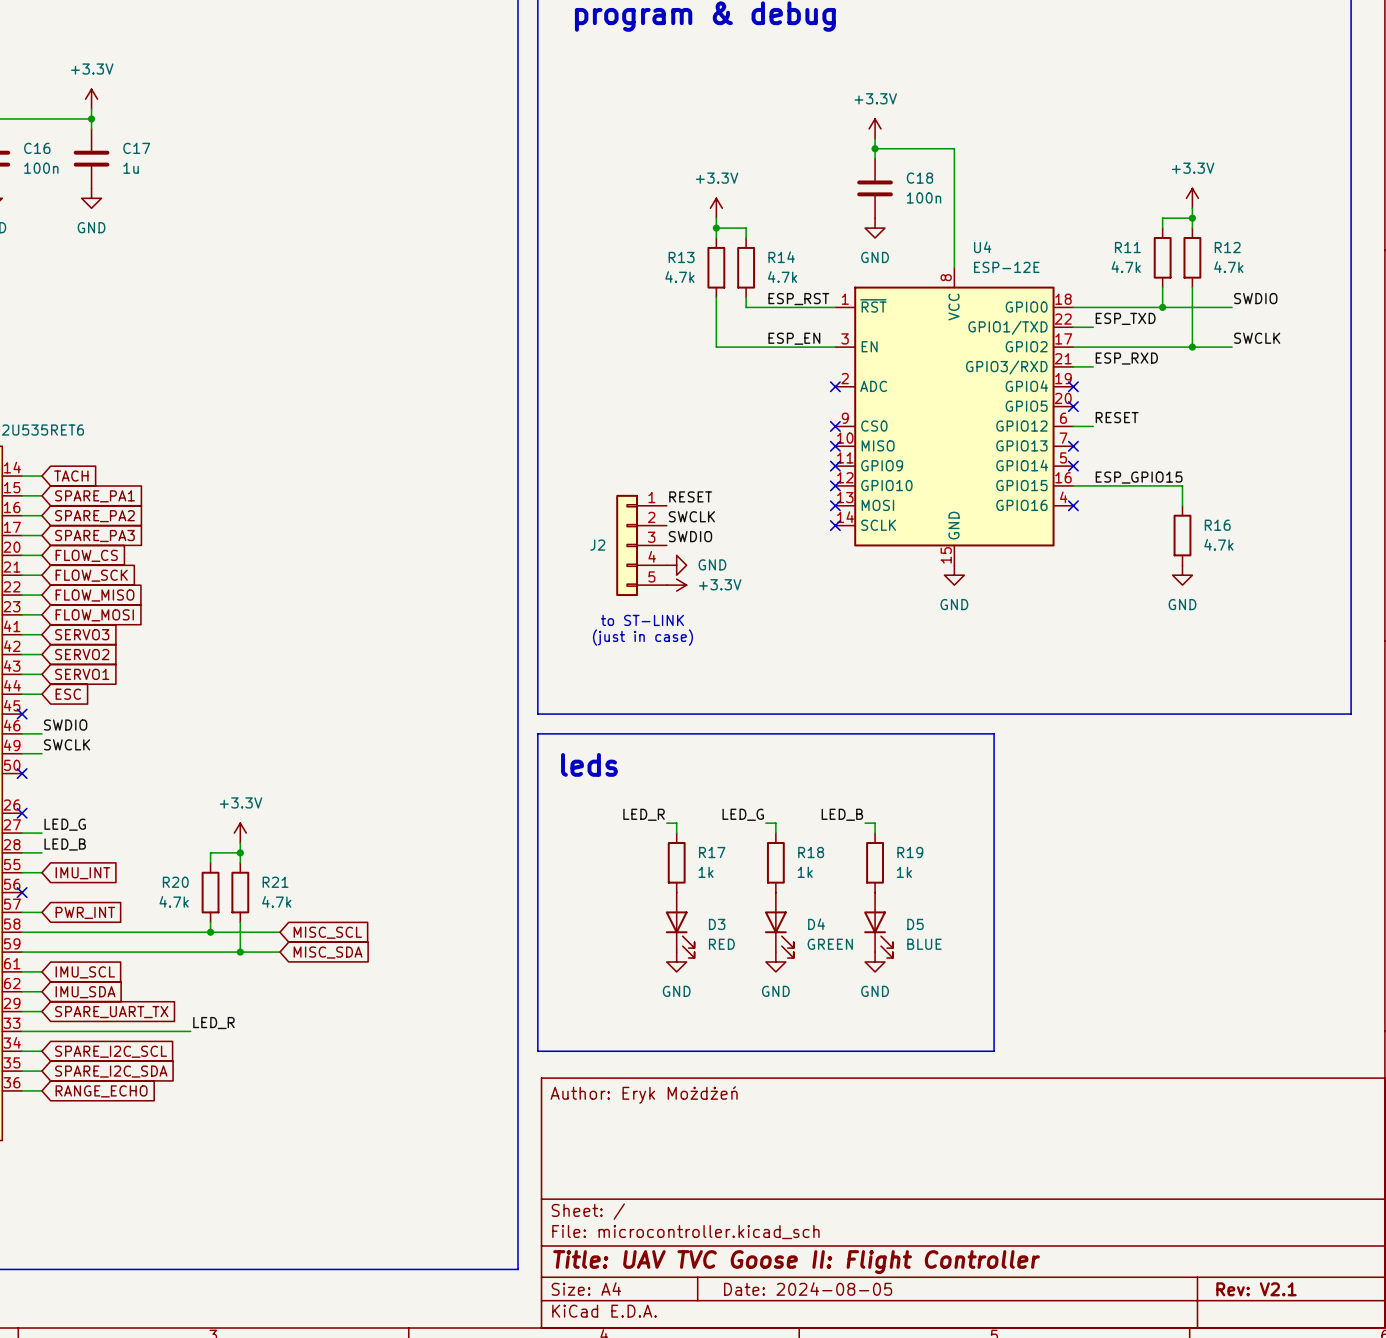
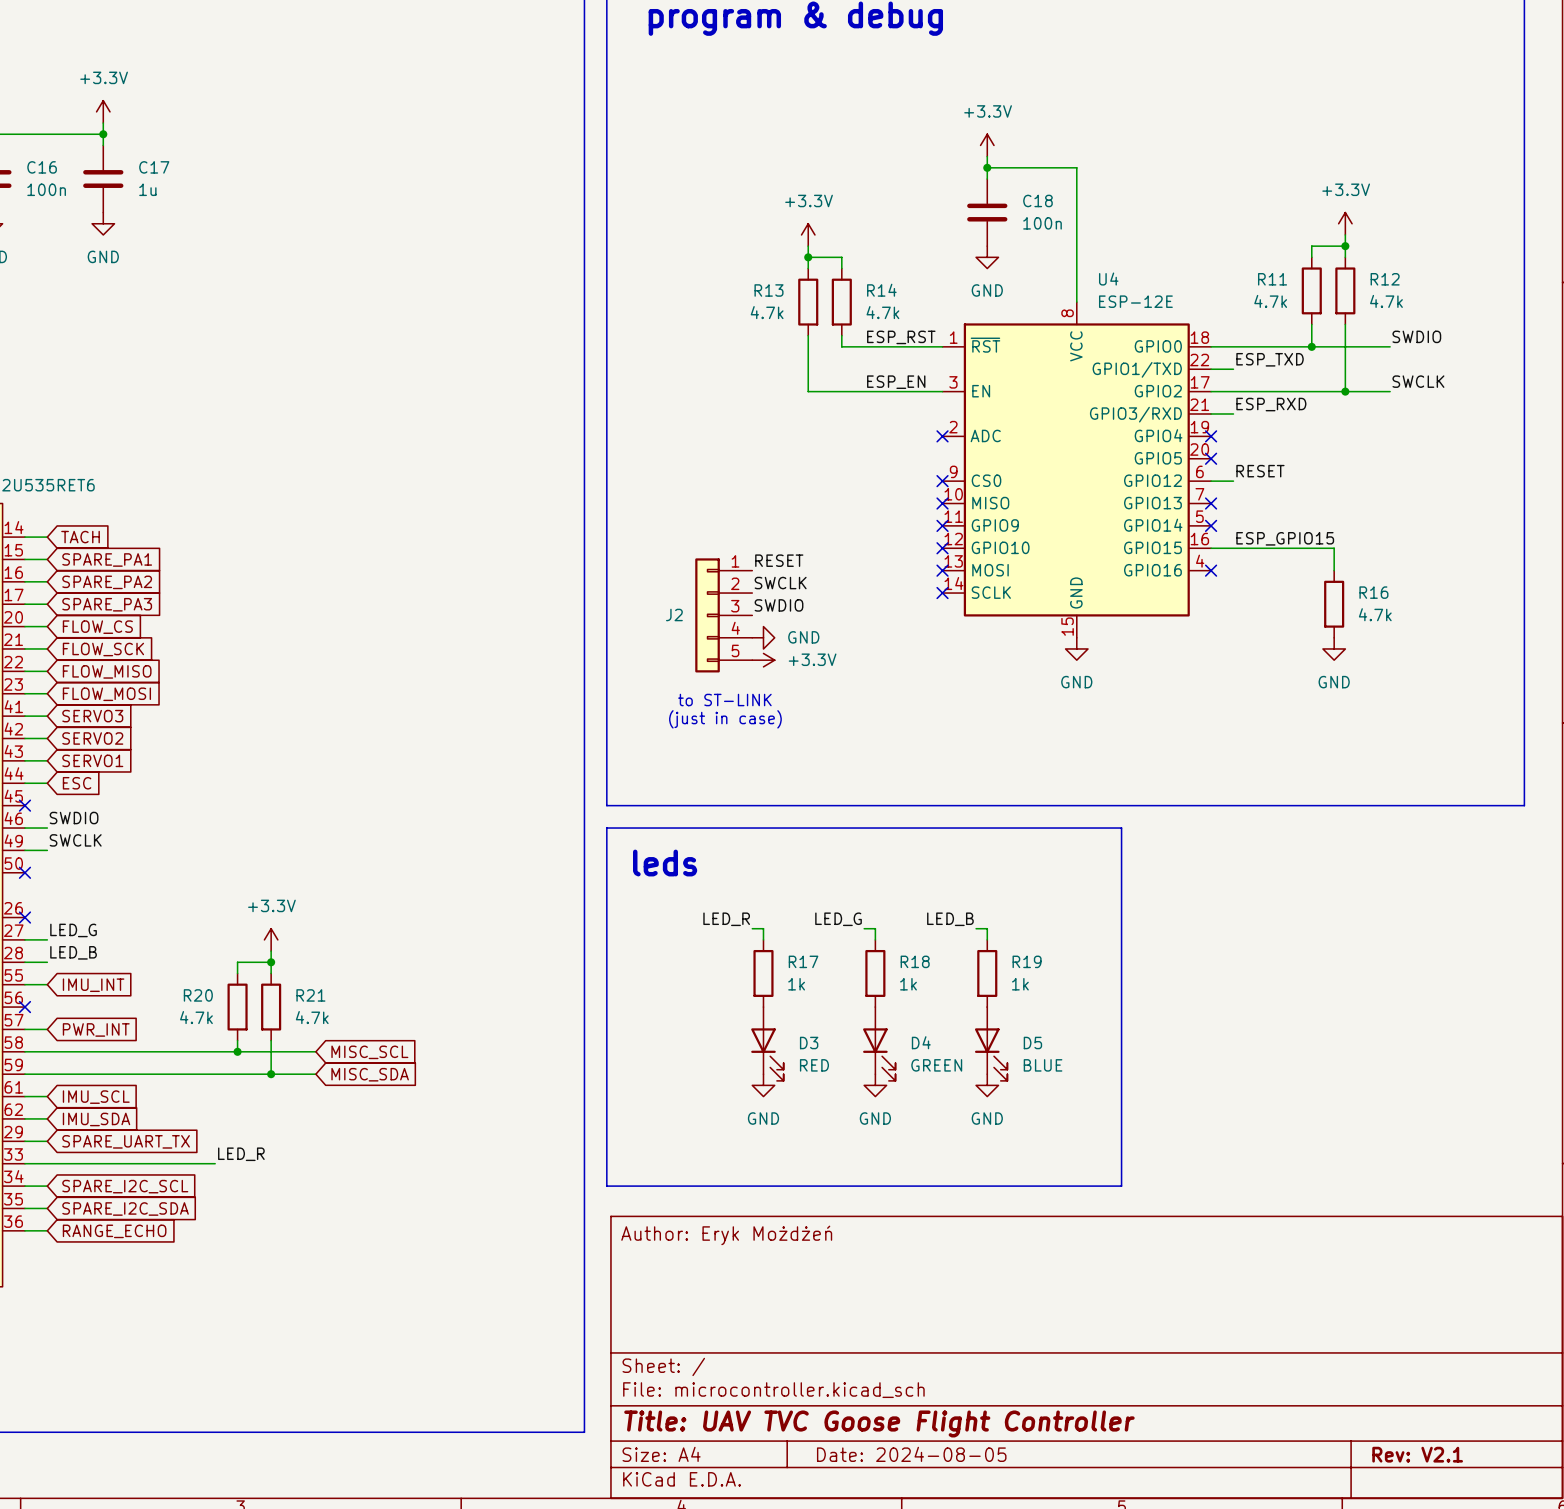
title block: Title: UAV TVC Goose II: Flight Controller (796, 1262) -> Title: UAV TVC Goose Flight Controller (879, 1423)

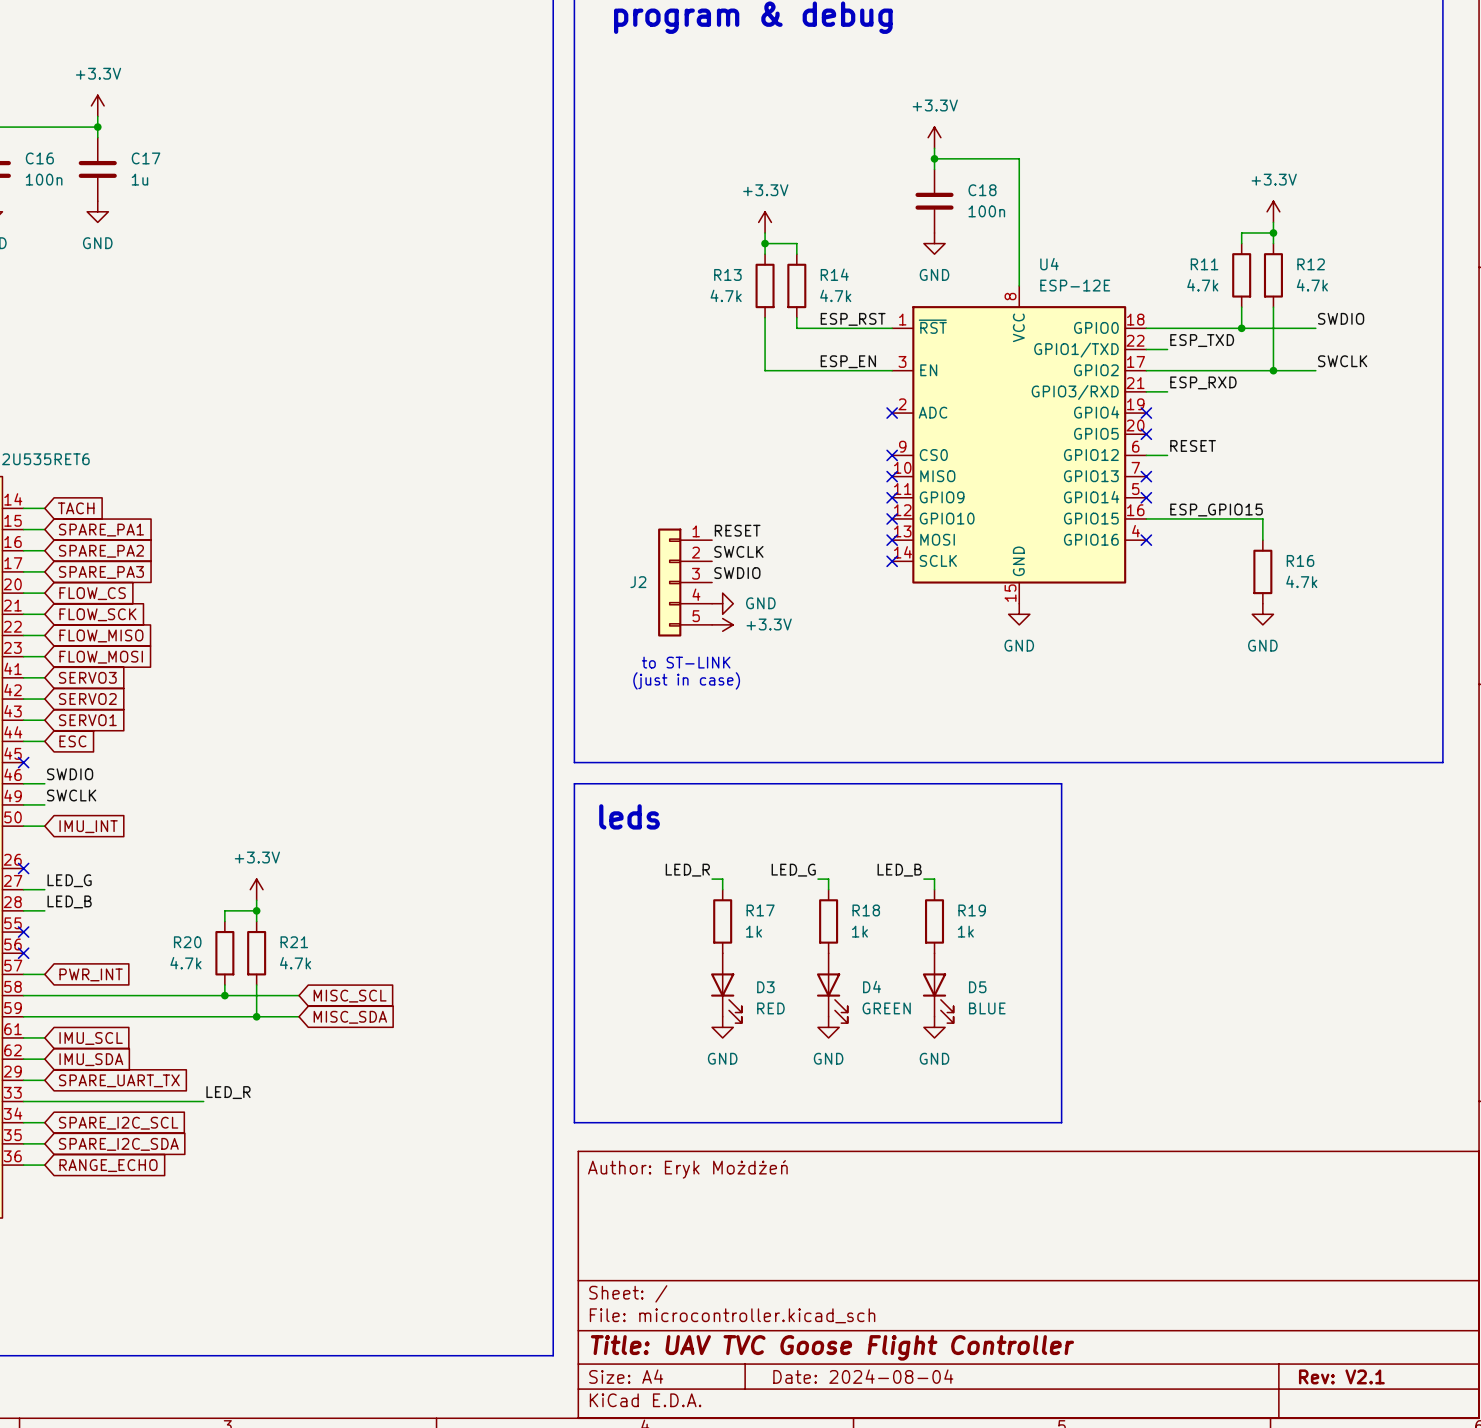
no-connect mark: (24, 872) -> none
wire: (24, 984) (47, 984) -> (23, 826) (44, 826)
no-connect mark: none -> (23, 932)
global label position: IMU_INT (93, 985) -> IMU_INT (88, 826)
title block: Date: 2024-08-05 (911, 1454) -> Date: 2024-08-04 (863, 1376)

